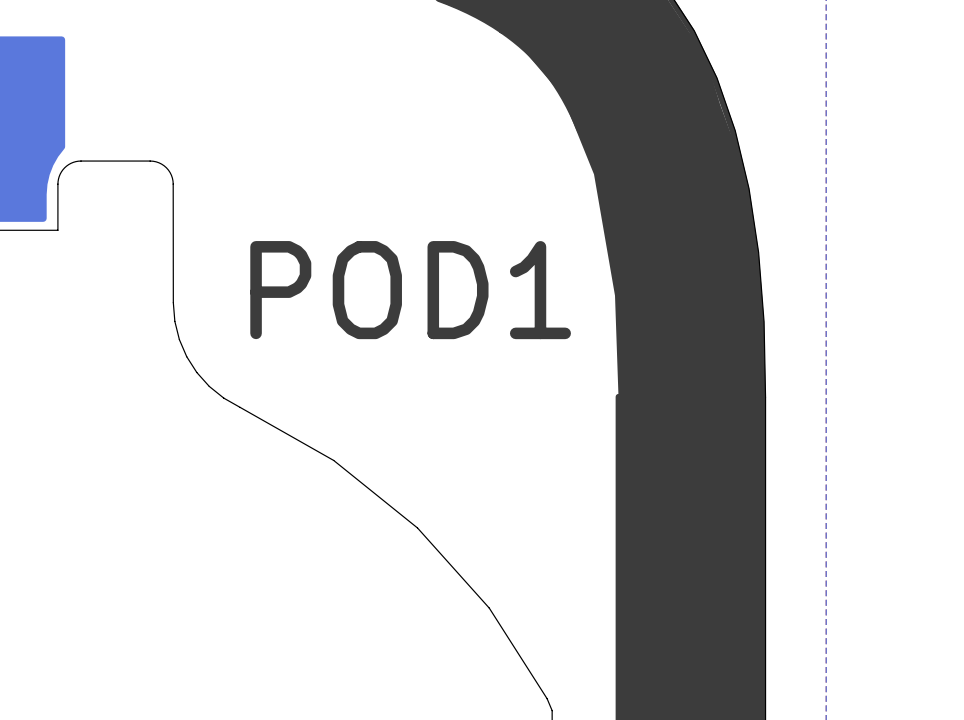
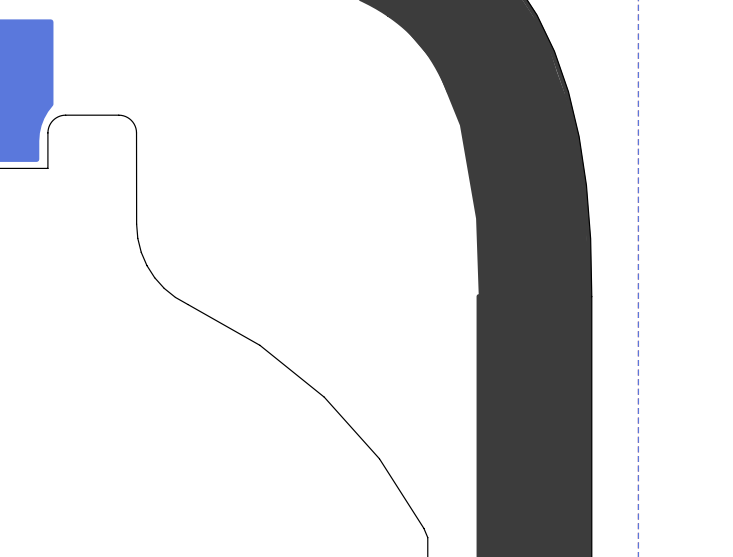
text: POD1 (410, 290) -> none

